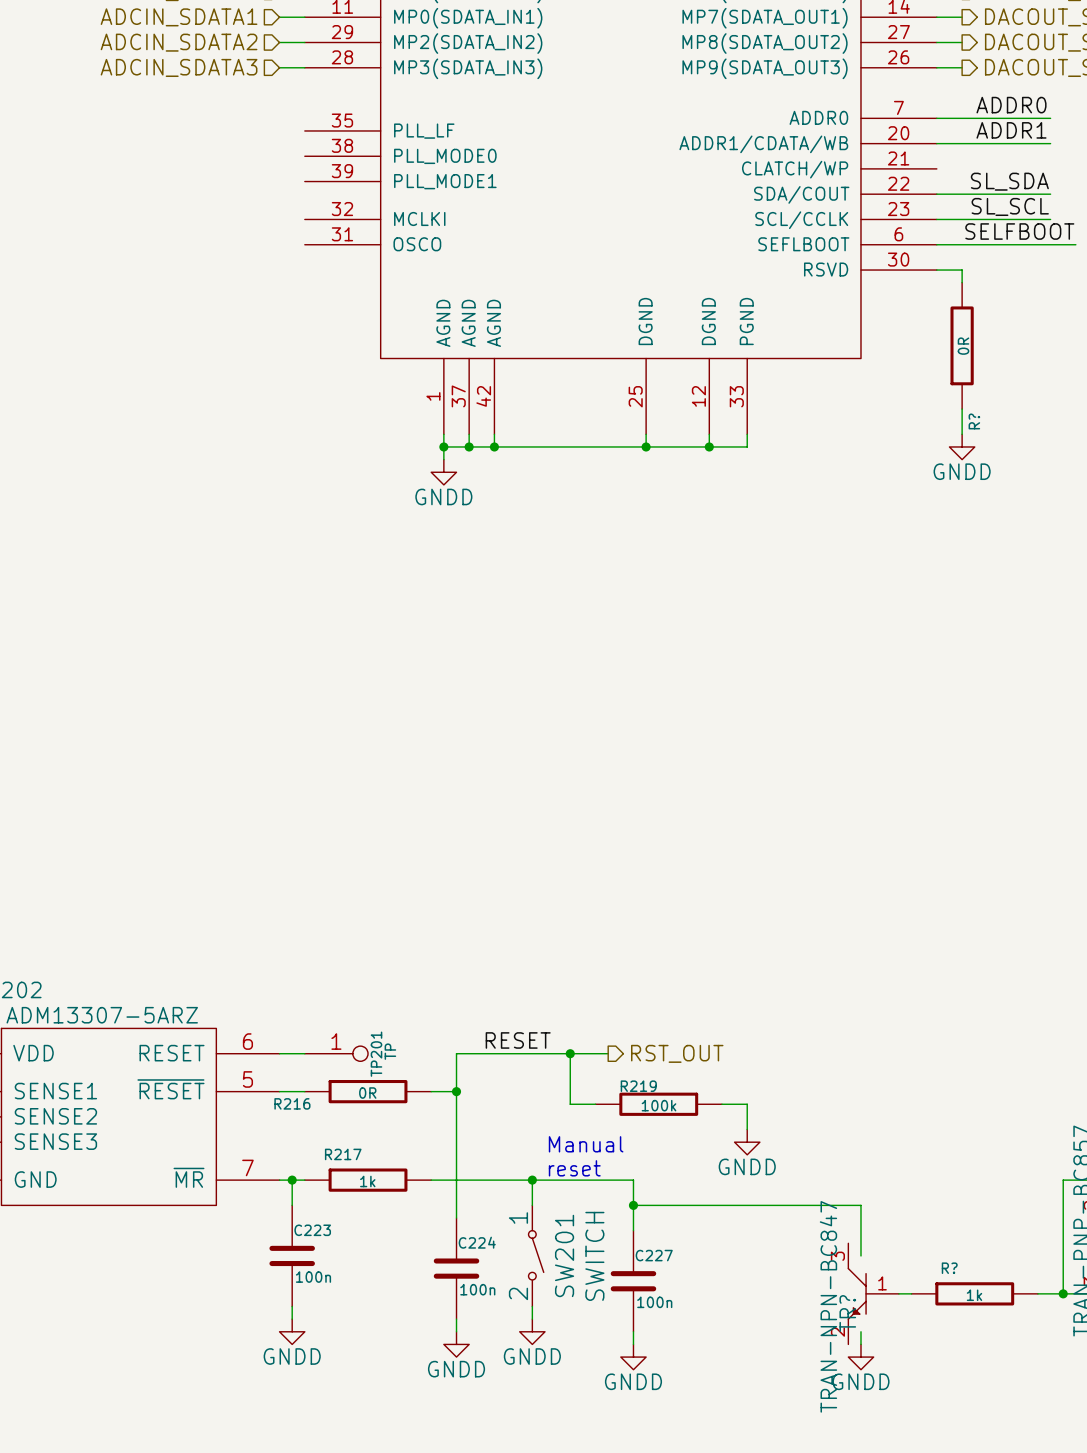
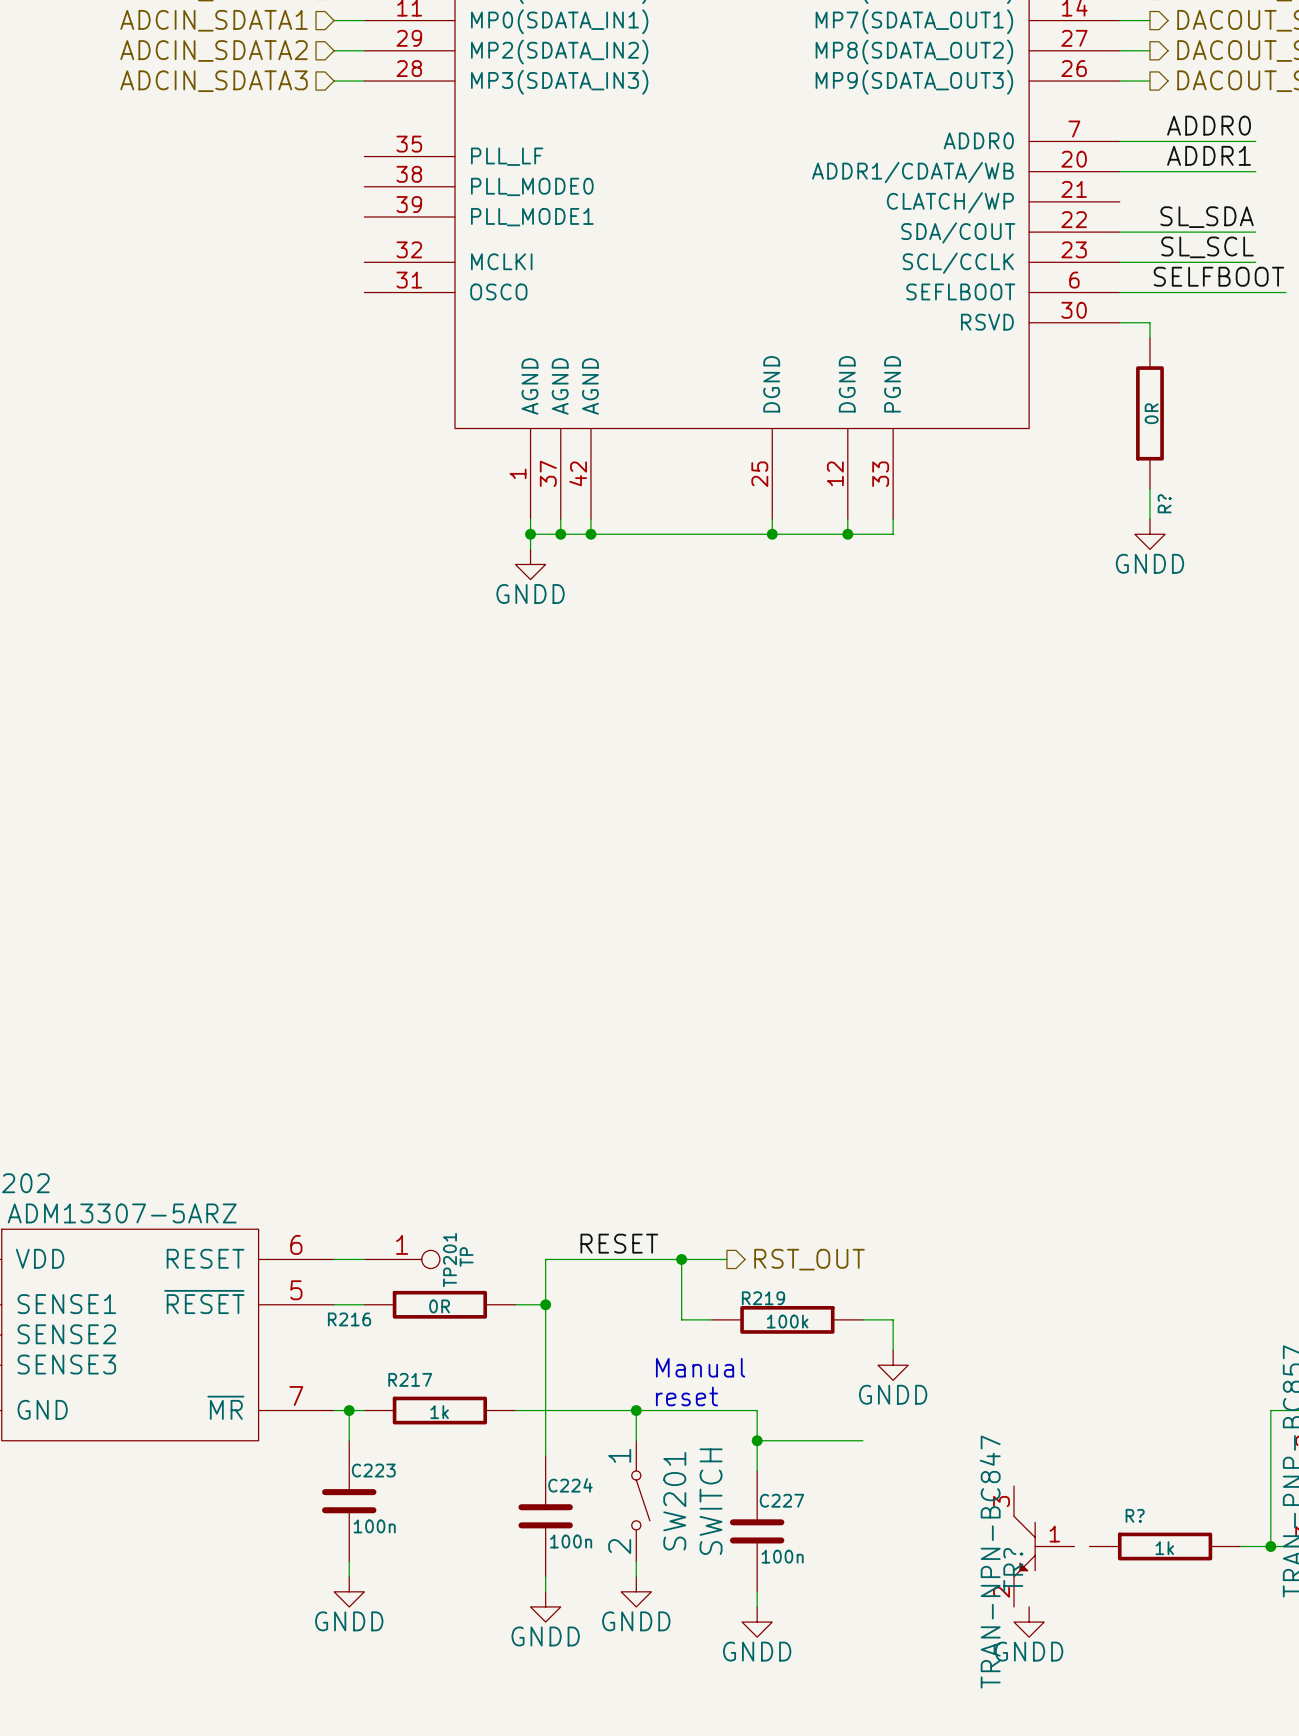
wire: (721, 1205) (860, 1205) (860, 1255) -> none
wire: (898, 1293) (911, 1293) -> none
wire: (860, 1331) (860, 1344) -> none

